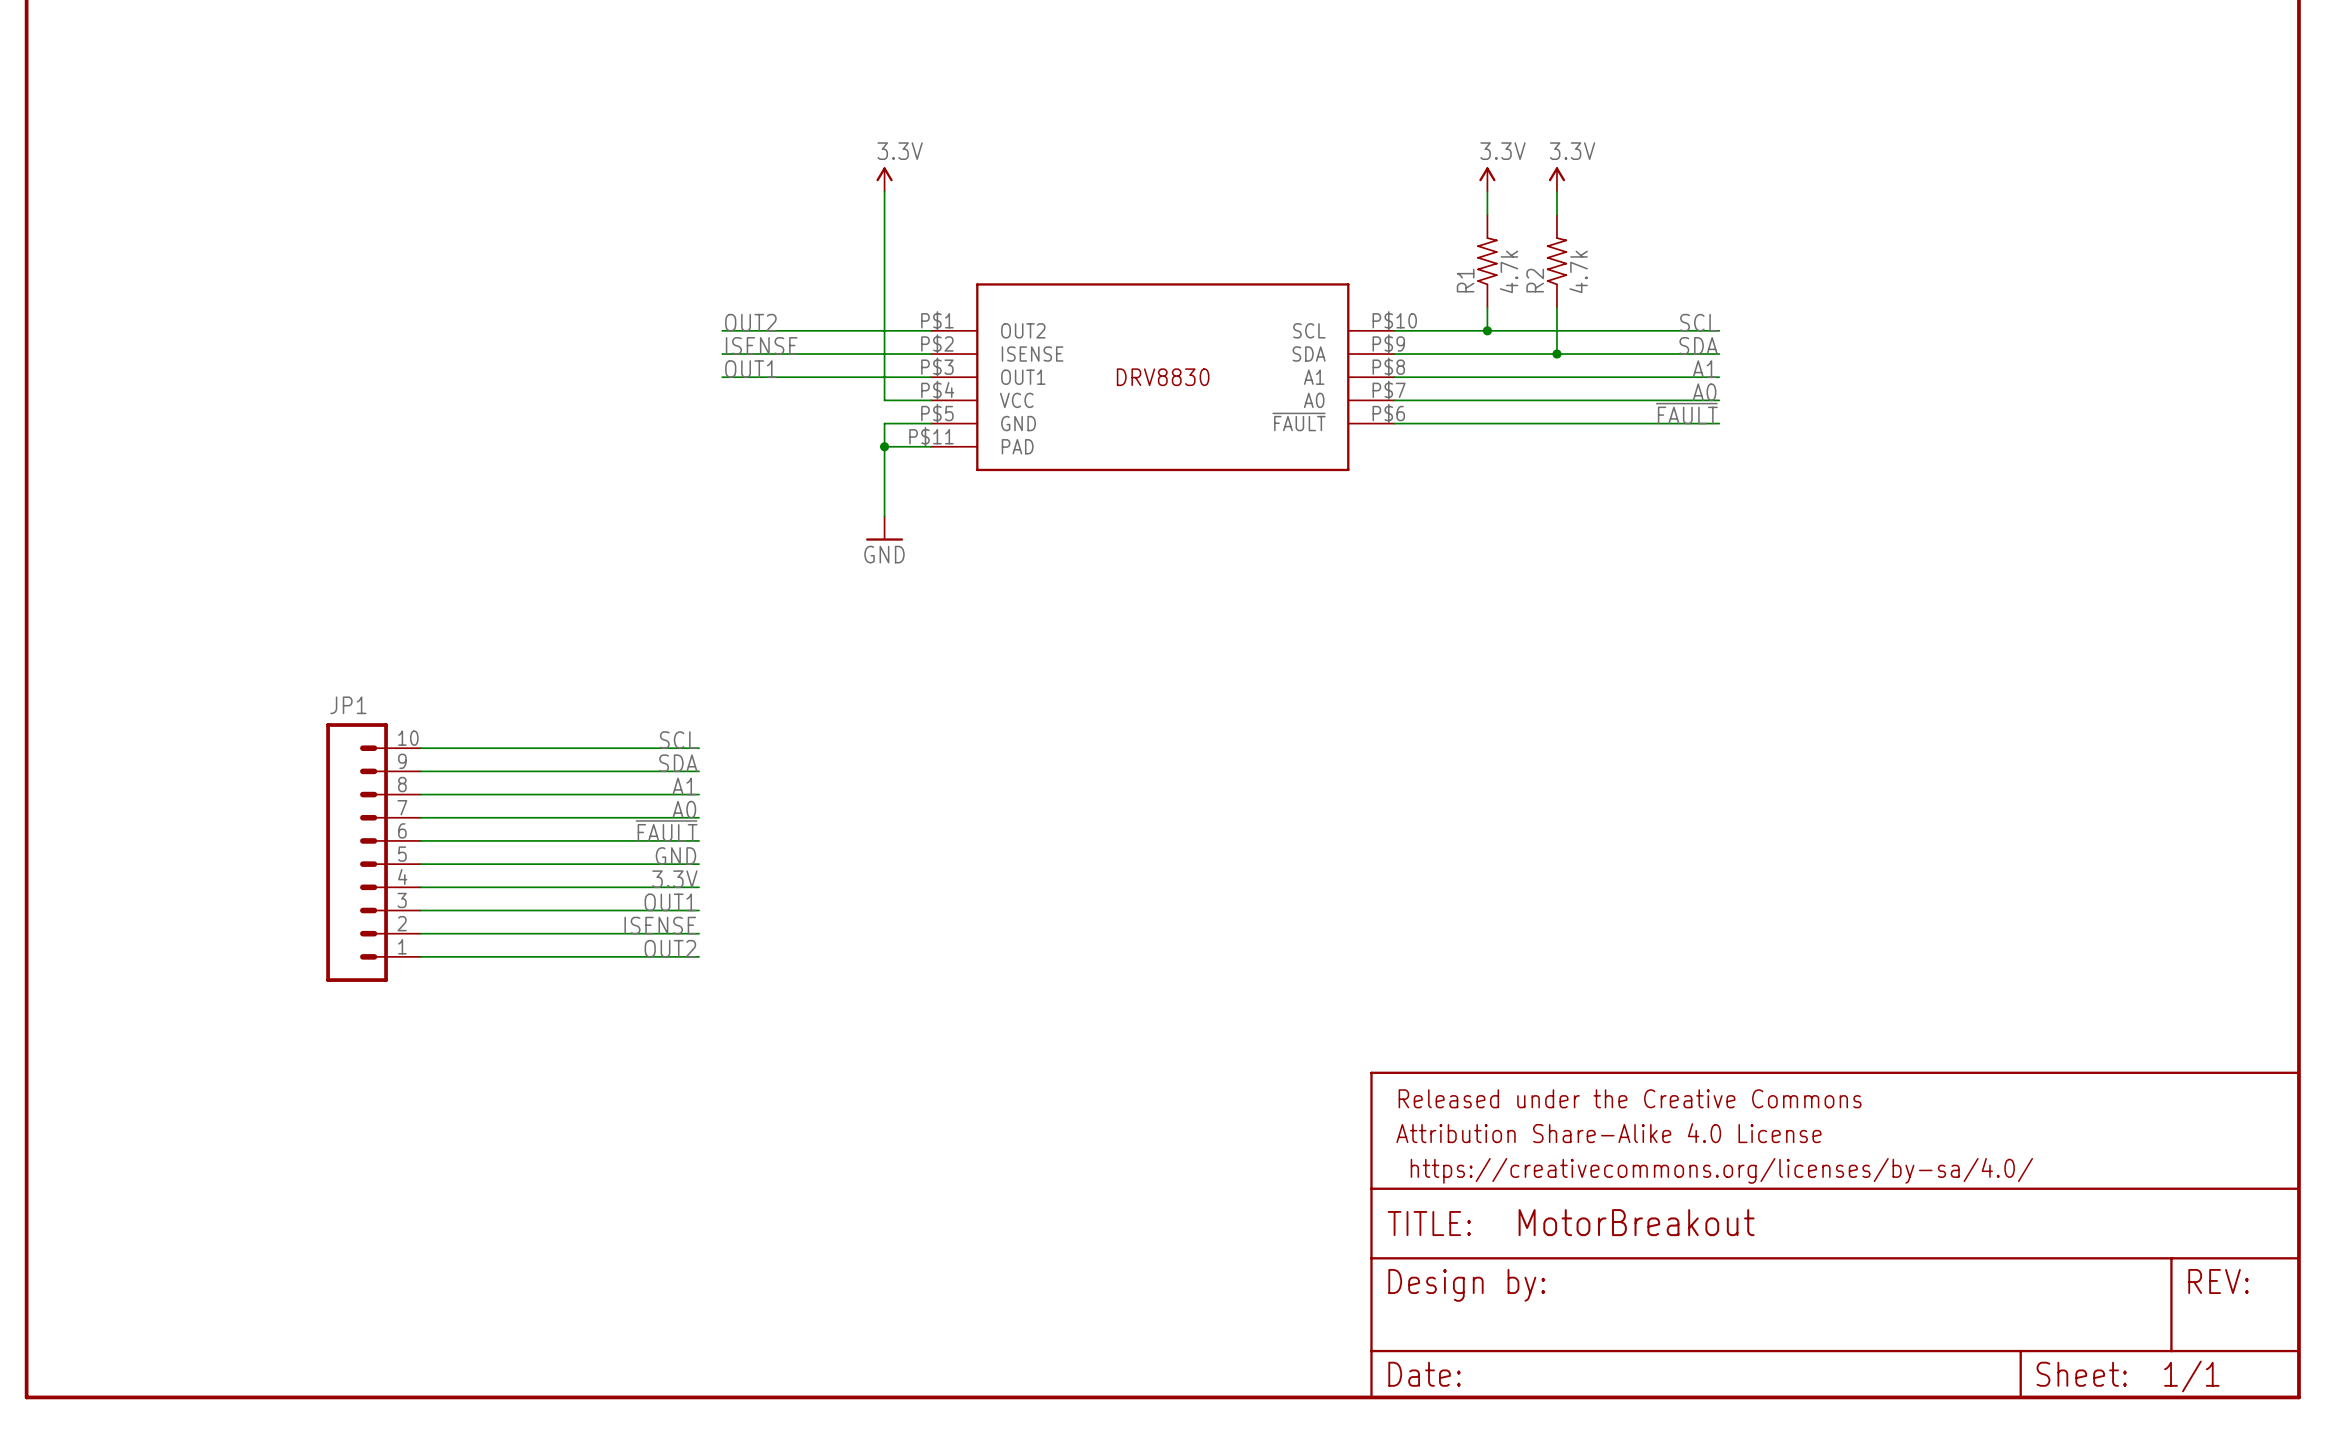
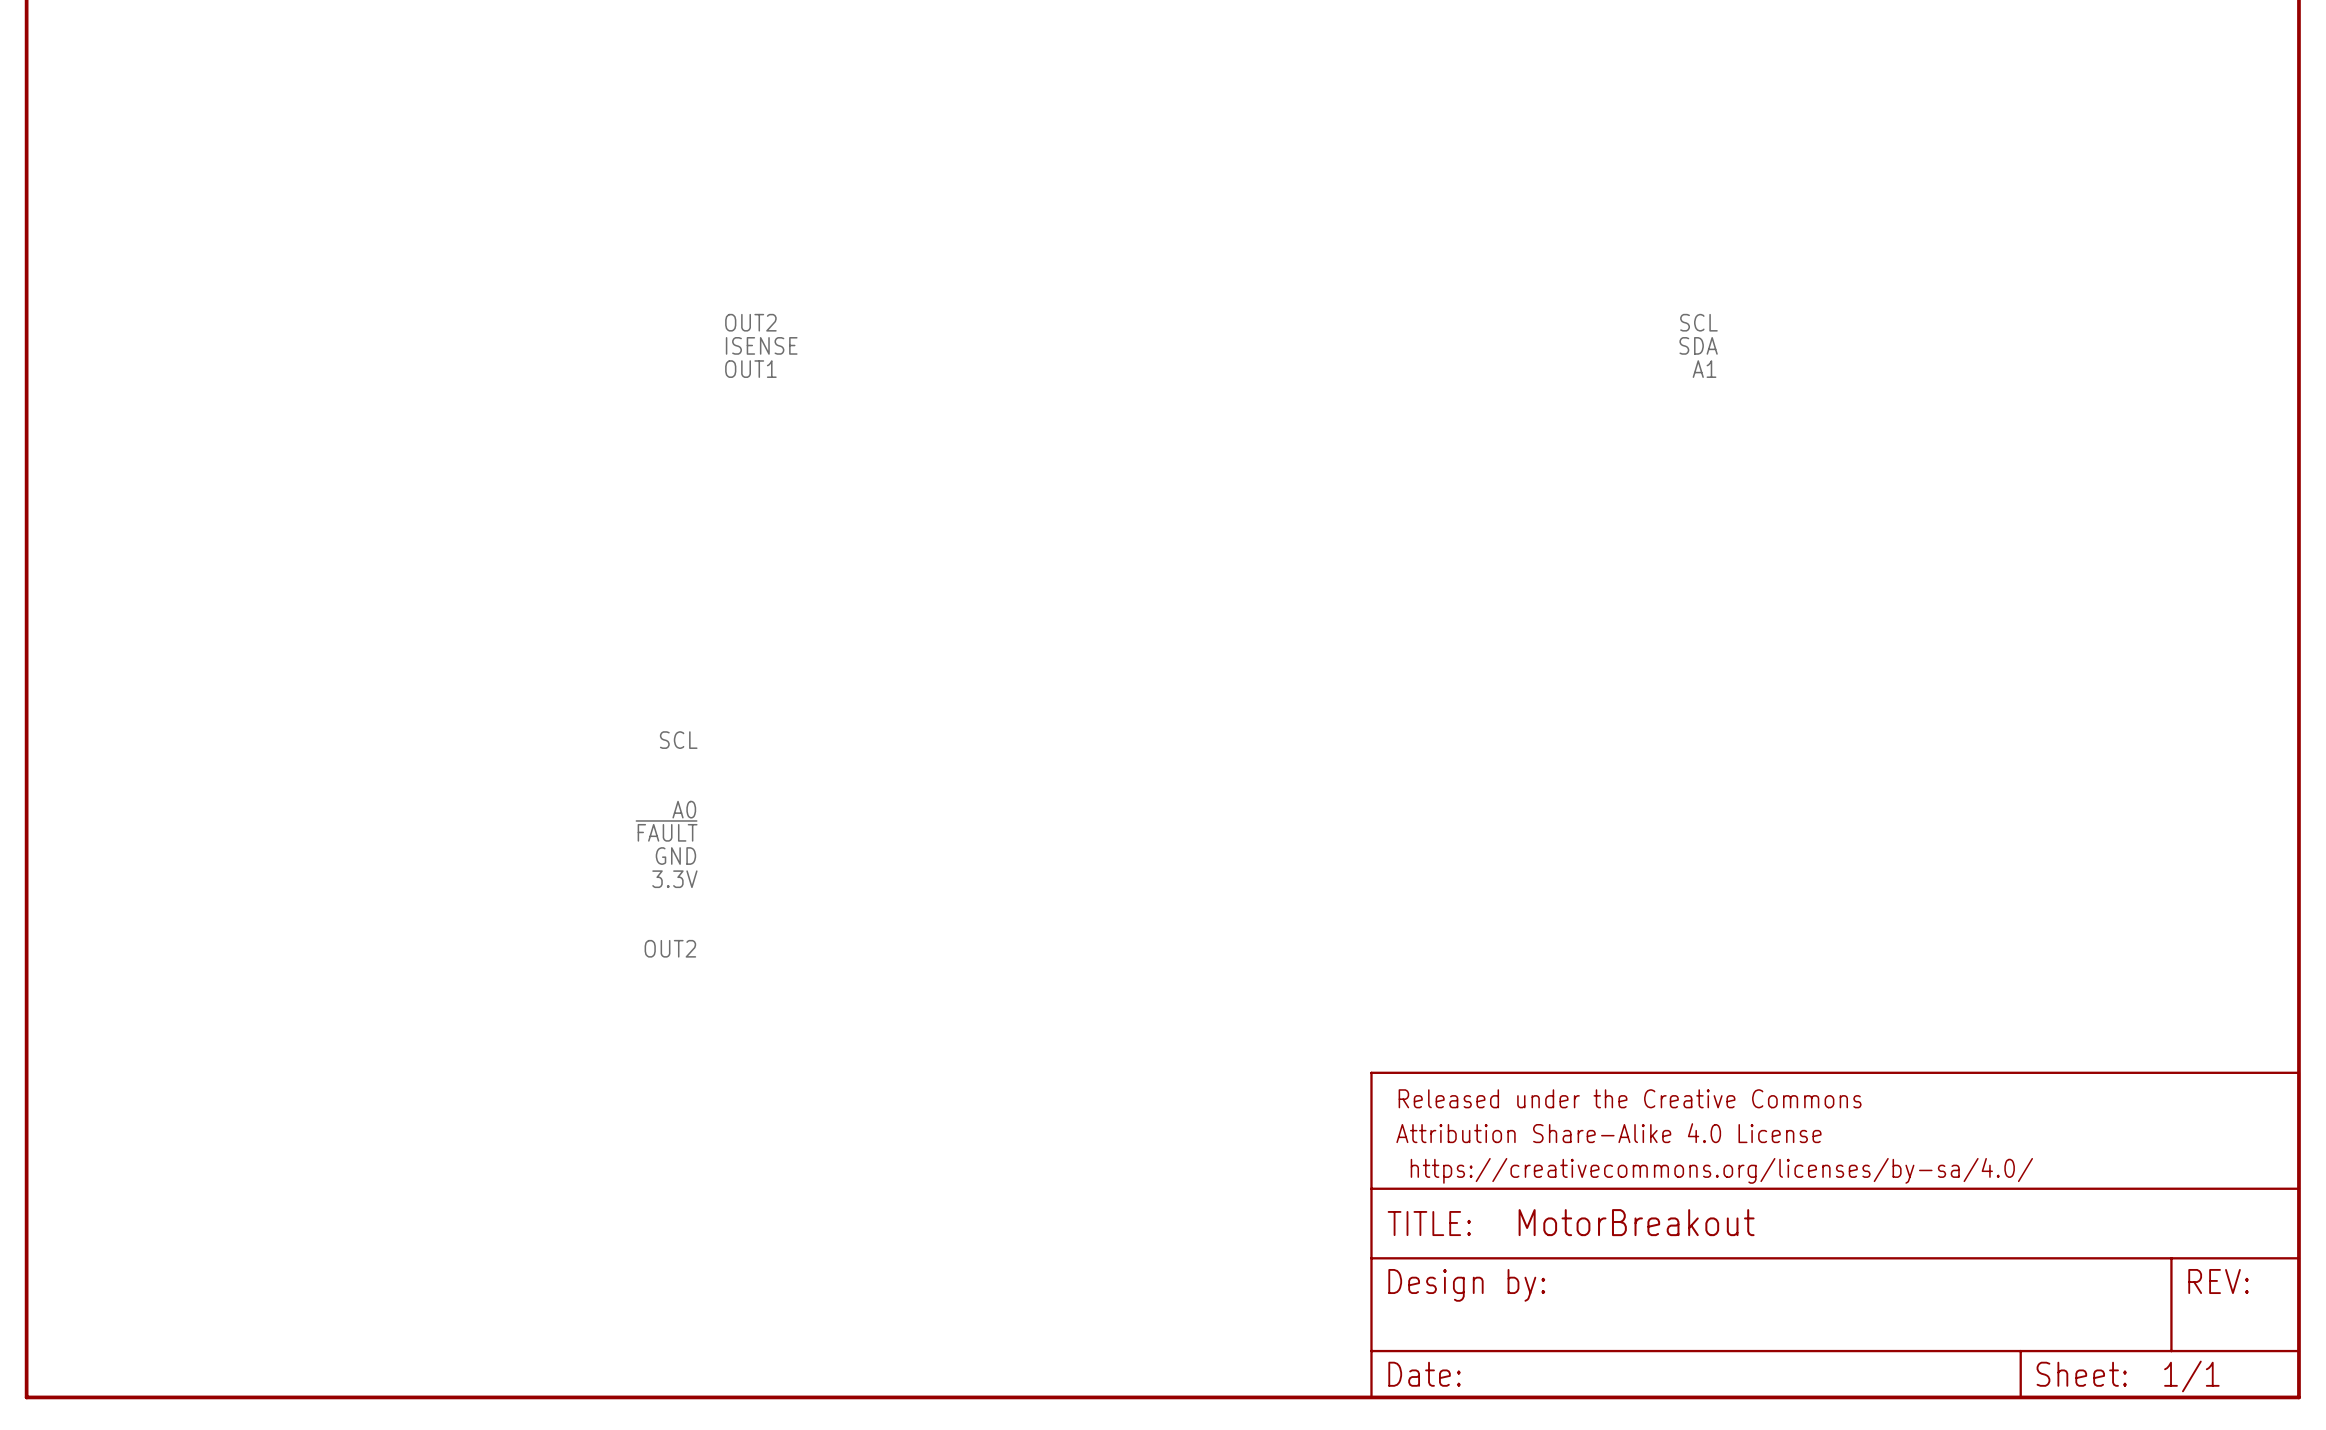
power symbol: 3.3V (884, 179) -> none
power symbol: 3.3V (1487, 179) -> none
power symbol: 3.3V (1556, 179) -> none
wire: (884, 191) (884, 400) (930, 400) -> none
wire: (1487, 191) (1487, 214) -> none
wire: (1556, 191) (1556, 214) -> none
R1: 4.7k (1487, 261) -> none
R2: 4.7k (1556, 261) -> none
wire: (1487, 307) (1487, 330) -> none
wire: (1556, 307) (1556, 354) -> none
wire: (722, 330) (930, 330) -> none
wire: (1394, 330) (1719, 330) -> none
junction: (1487, 330) -> none
wire: (722, 354) (930, 354) -> none
wire: (1394, 354) (1719, 354) -> none
junction: (1556, 354) -> none
wire: (722, 377) (930, 377) -> none
part: (1162, 377) -> none
wire: (1394, 377) (1719, 377) -> none
label: A0 (1704, 392) -> none
wire: (1394, 400) (1719, 400) -> none
label: ~{FAULT} (1686, 413) -> none
wire: (930, 423) (884, 423) (884, 516) -> none
wire: (1394, 423) (1719, 423) -> none
wire: (884, 446) (930, 446) -> none
junction: (884, 446) -> none
power symbol: GND (884, 528) -> none
wire: (420, 748) (699, 748) -> none
label: SDA (678, 763) -> none
wire: (420, 771) (699, 771) -> none
label: A1 (684, 786) -> none
wire: (420, 794) (699, 794) -> none
wire: (420, 817) (699, 817) -> none
wire: (420, 840) (699, 840) -> none
JP1: (373, 852) -> none
wire: (420, 864) (699, 864) -> none
wire: (420, 887) (699, 887) -> none
label: OUT1 (670, 902) -> none
wire: (420, 910) (699, 910) -> none
label: ISENSE (660, 925) -> none
wire: (420, 933) (699, 933) -> none
wire: (420, 956) (699, 956) -> none

